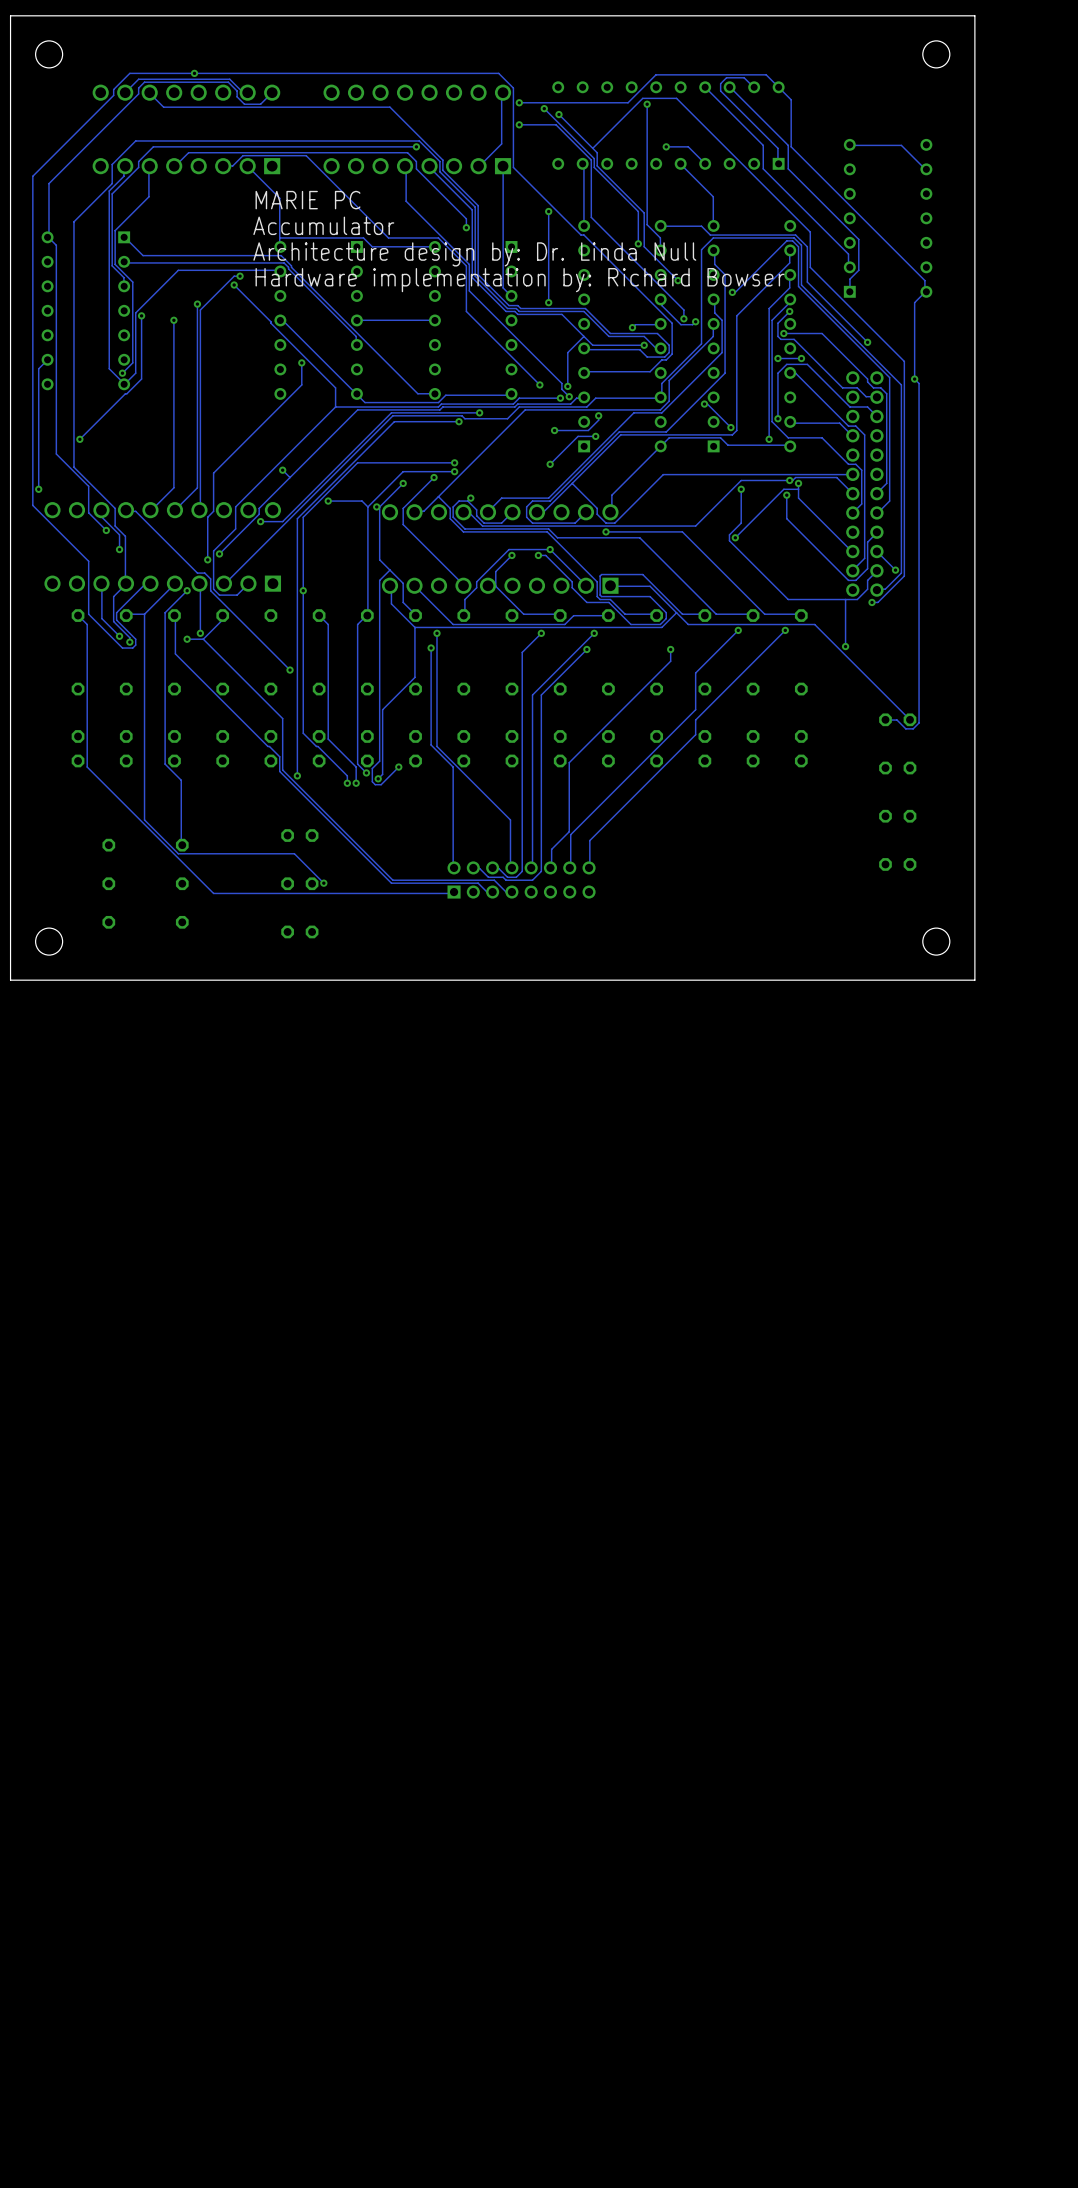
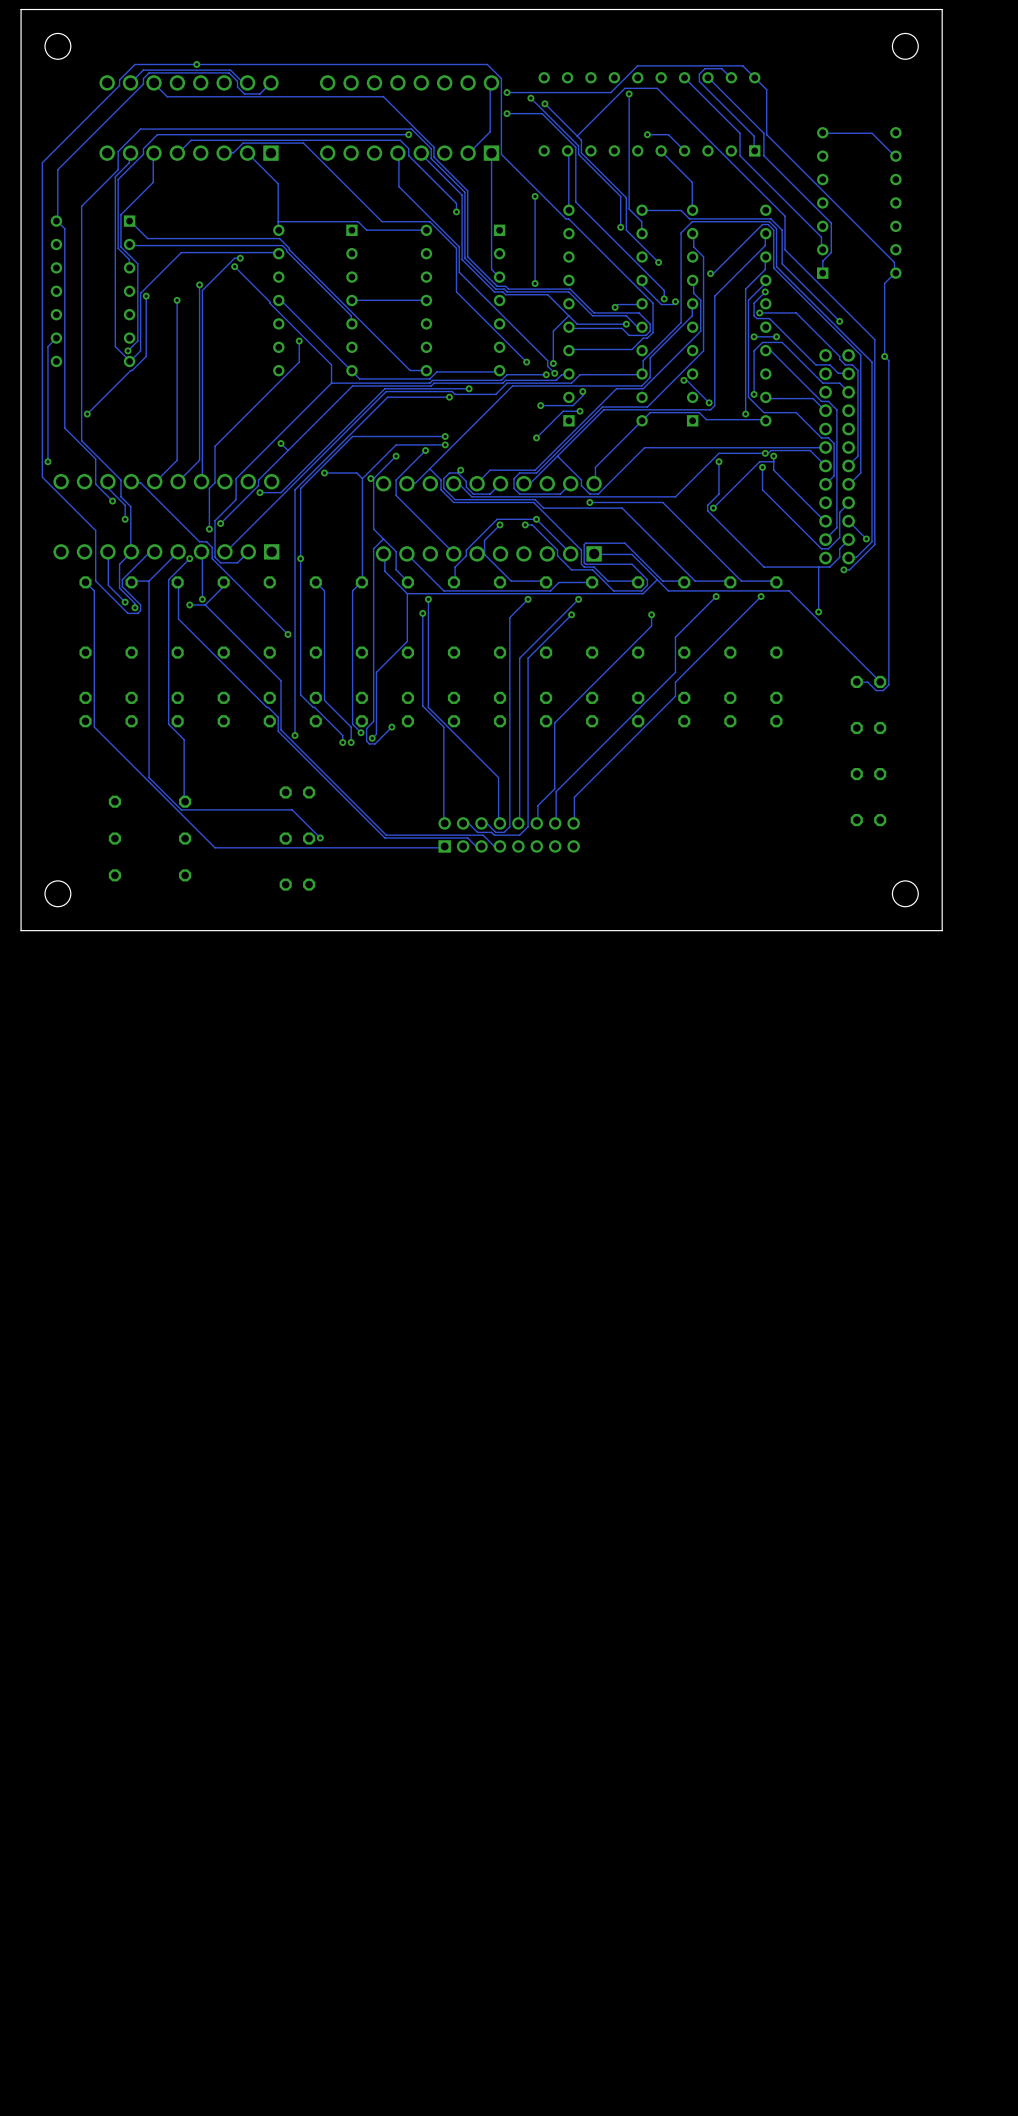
text: MARIE PC (308, 200) -> none
text: Accumulator (323, 225) -> none
text: Architecture design by: Dr. Linda Null (474, 254) -> none
text: Hardware implementation by: Richard Bowser (520, 280) -> none

